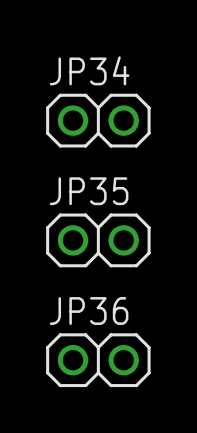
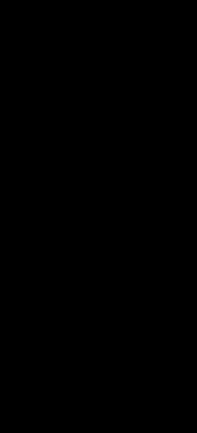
JP34: (98, 120) -> none
JP35: (98, 240) -> none
JP36: (98, 360) -> none

